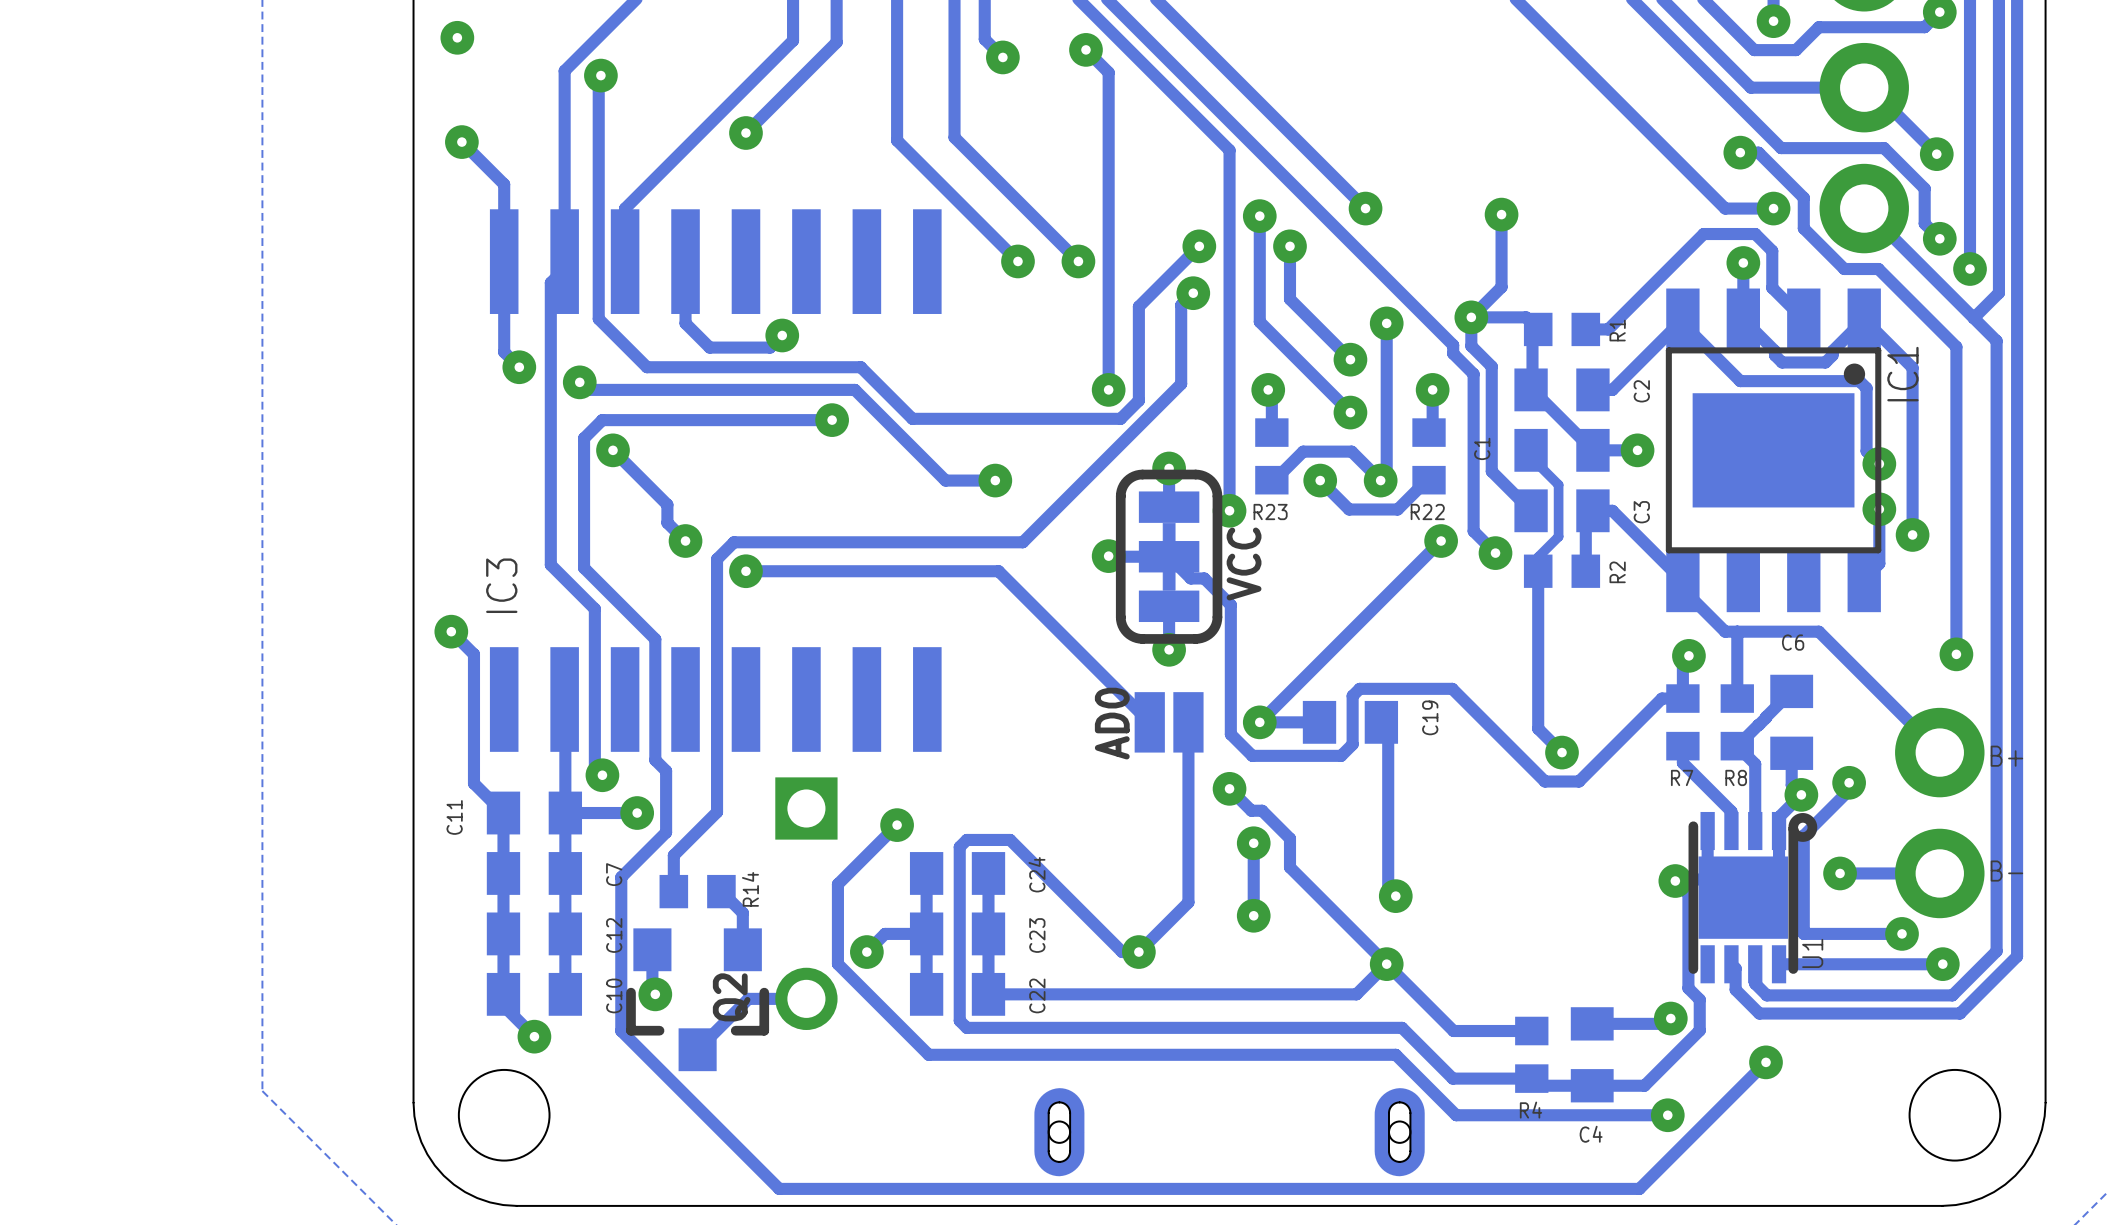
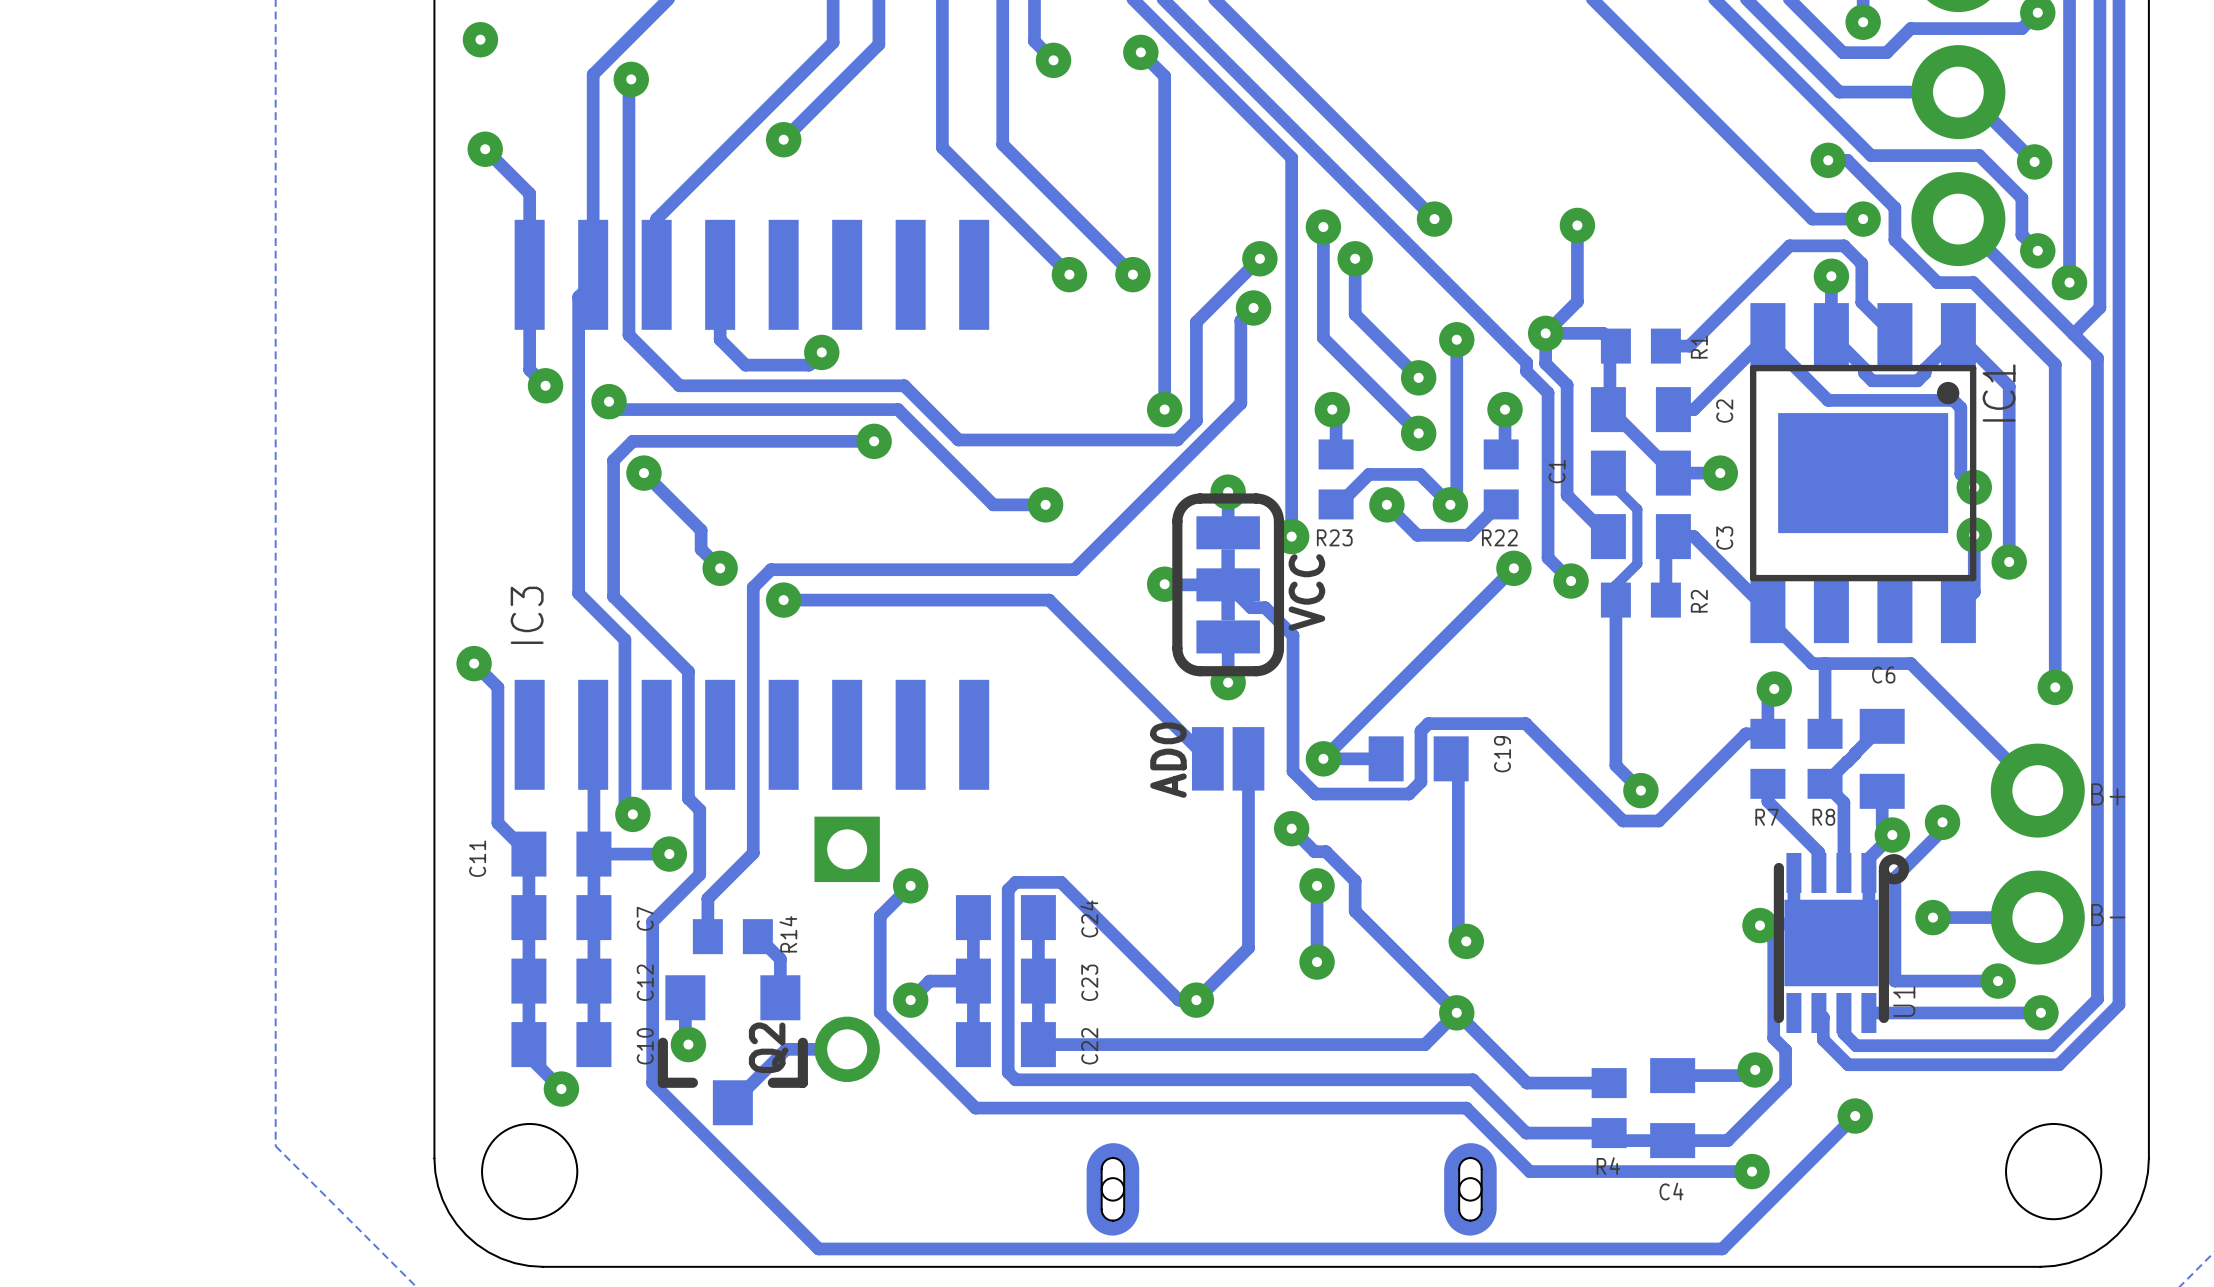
track: (897, 825) (837, 884) -> (910, 885) (880, 916) (880, 928)
via position: (897, 825) -> (910, 885)

